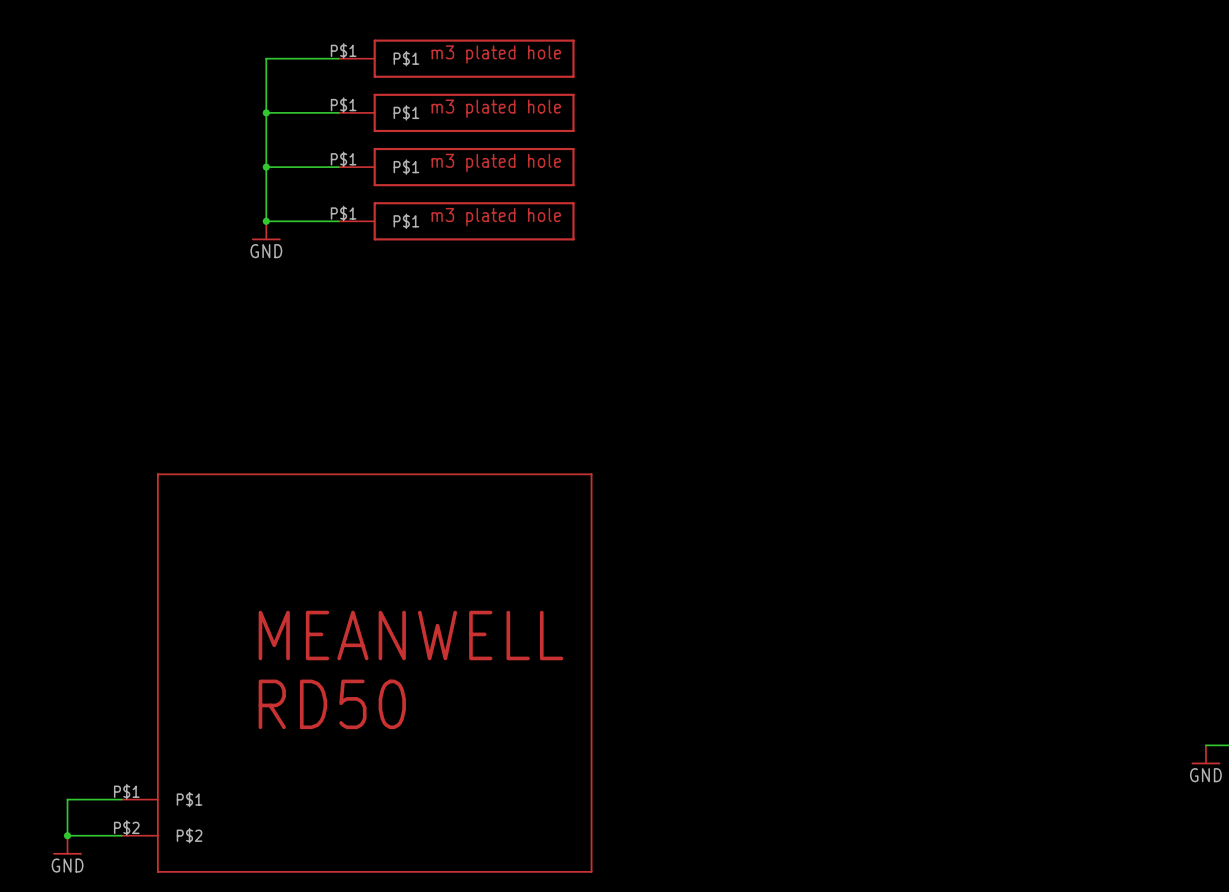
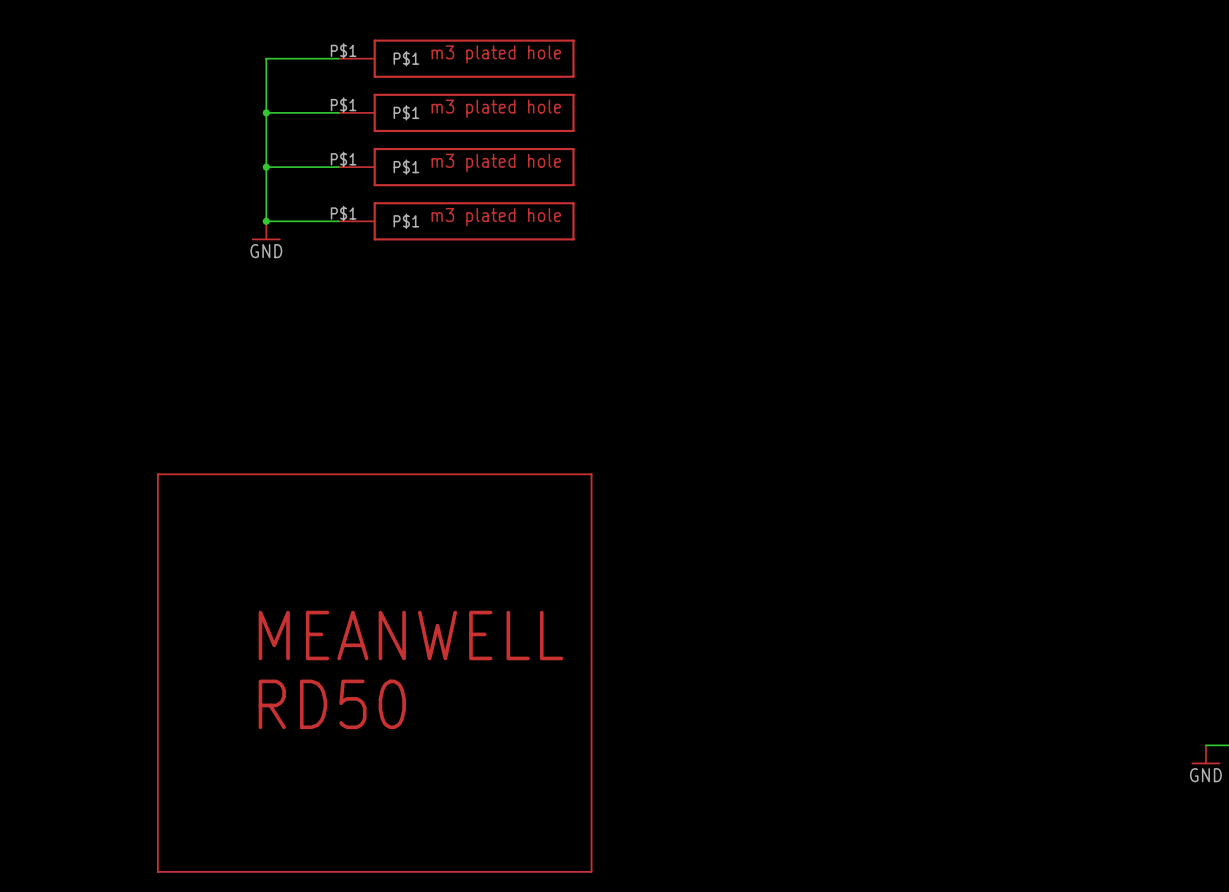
part: (357, 673) -> none
part: none -> (374, 673)
wire: (121, 799) (67, 799) (67, 835) (121, 835) -> none
junction: (67, 835) -> none
power symbol: GND (67, 845) -> none

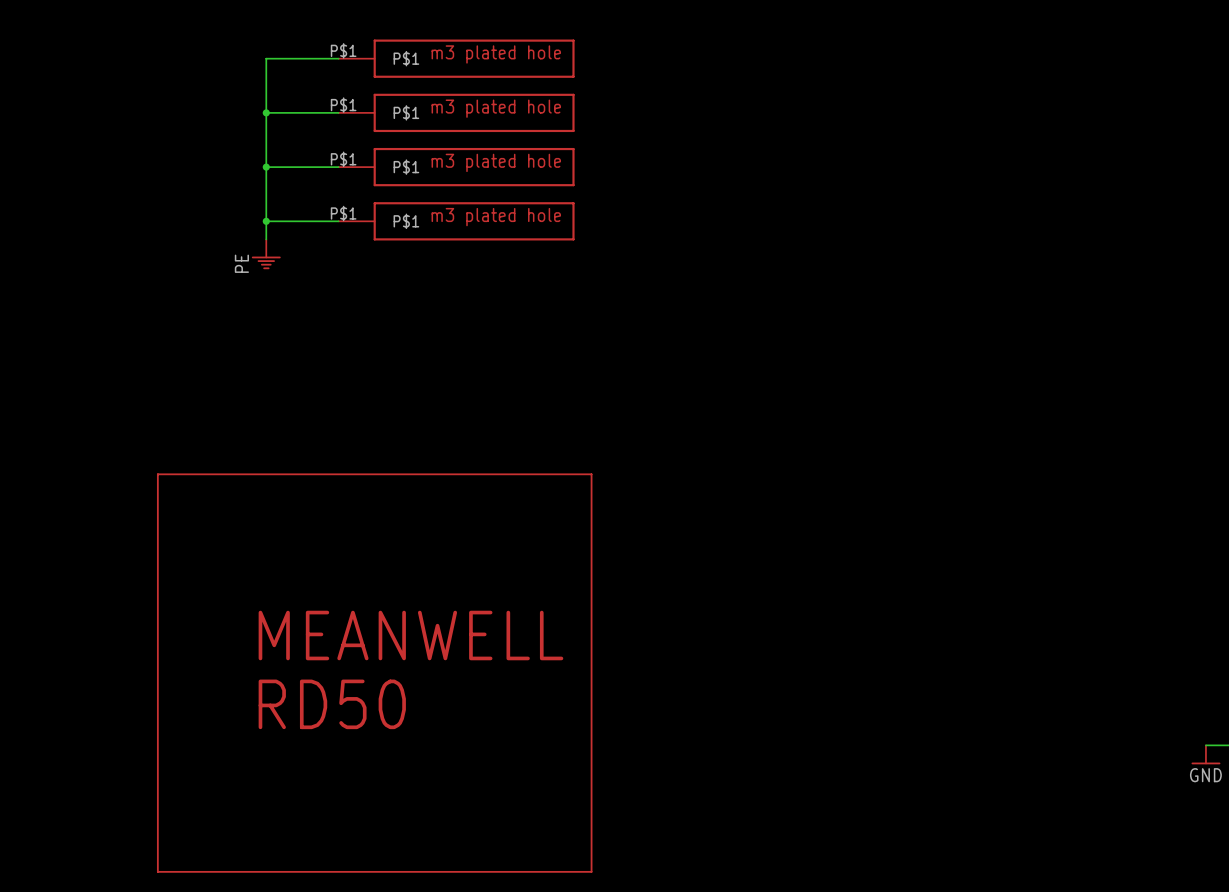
power symbol: GND (266, 230) -> none
power symbol: none -> PE (266, 254)

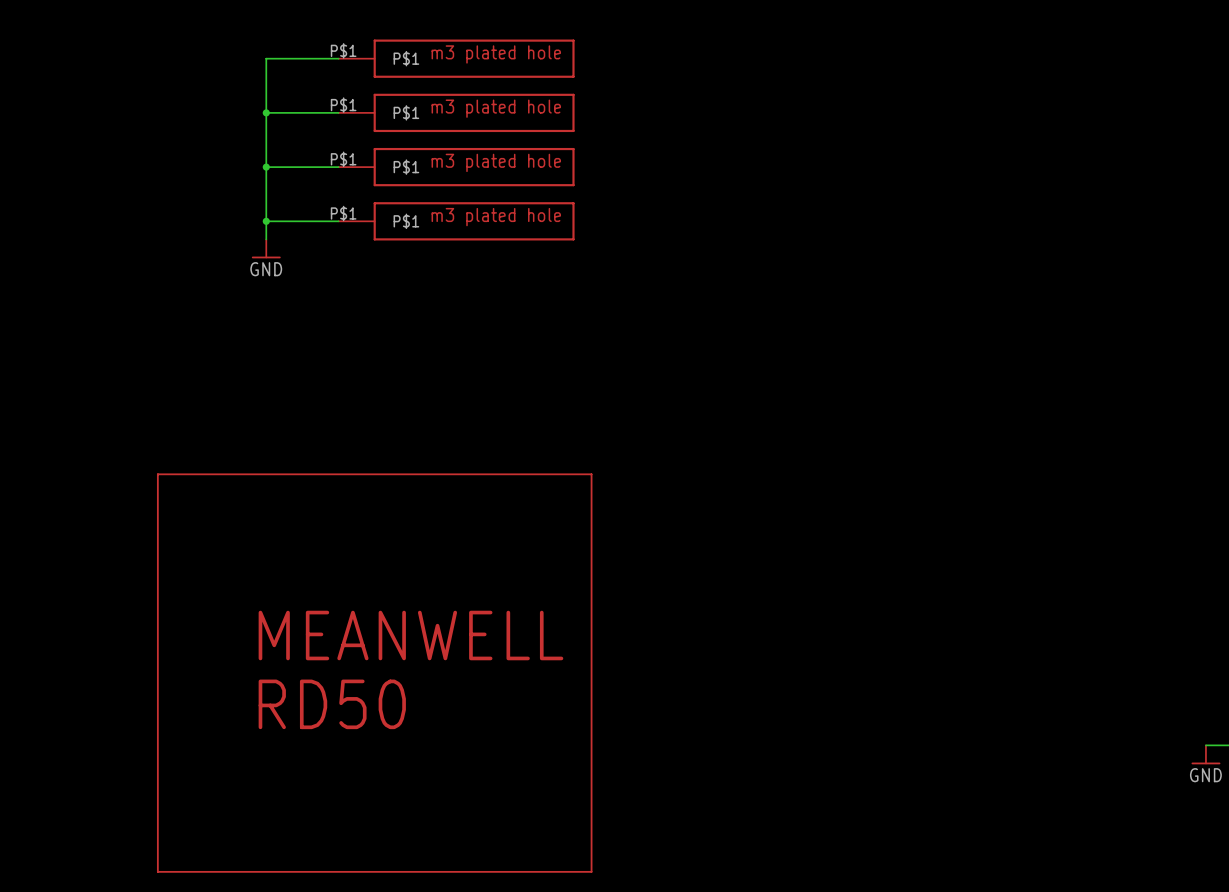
power symbol: PE (266, 254) -> GND (266, 248)

